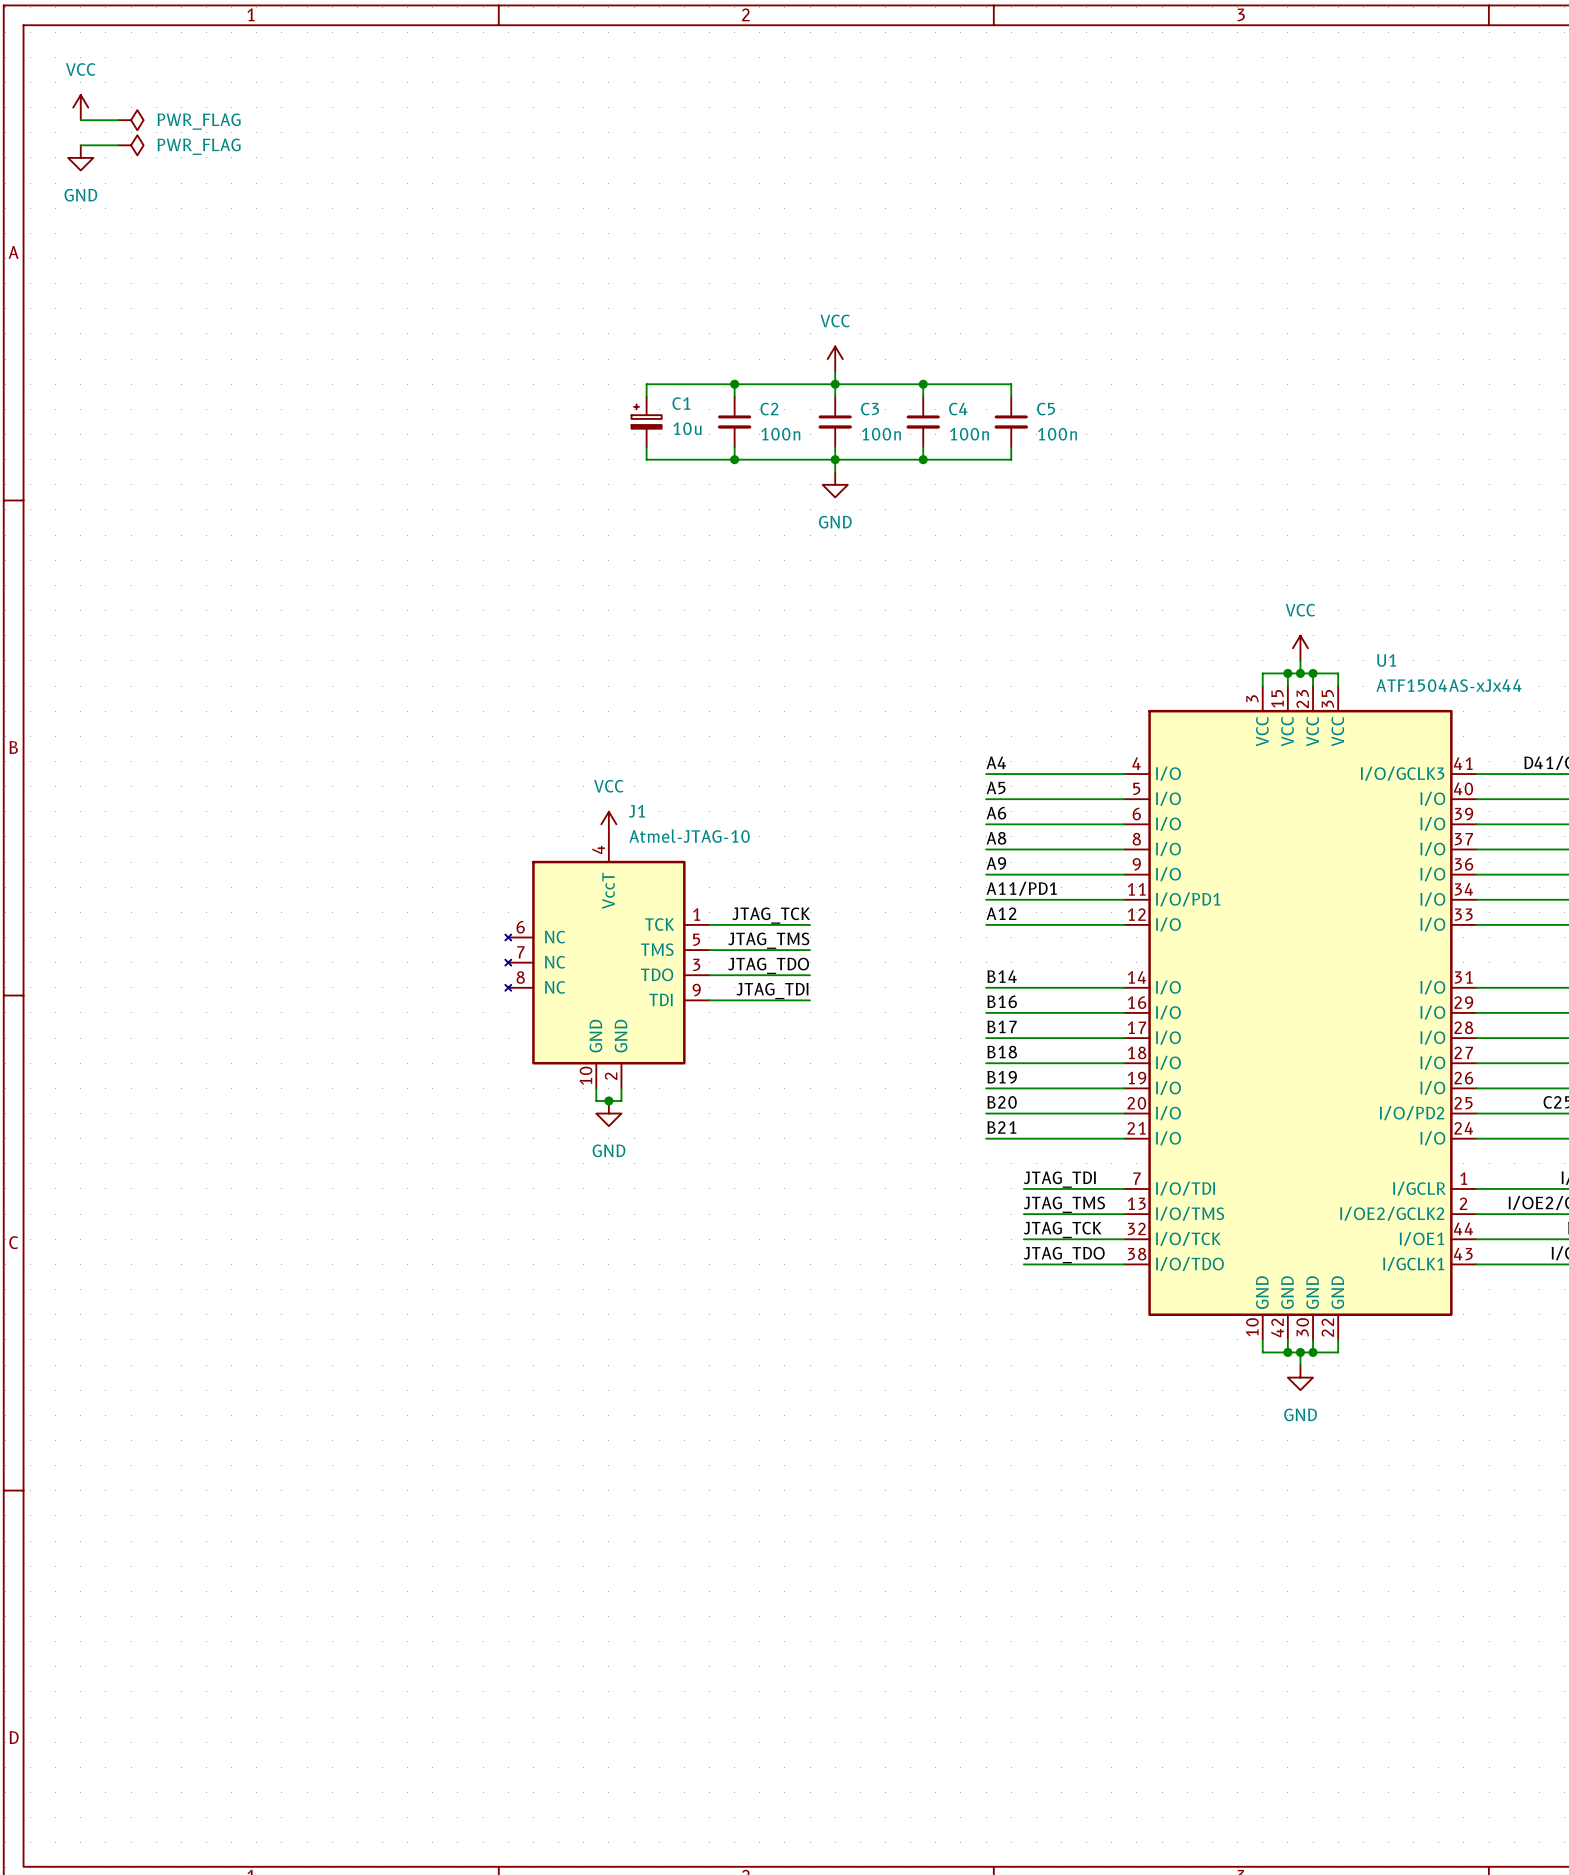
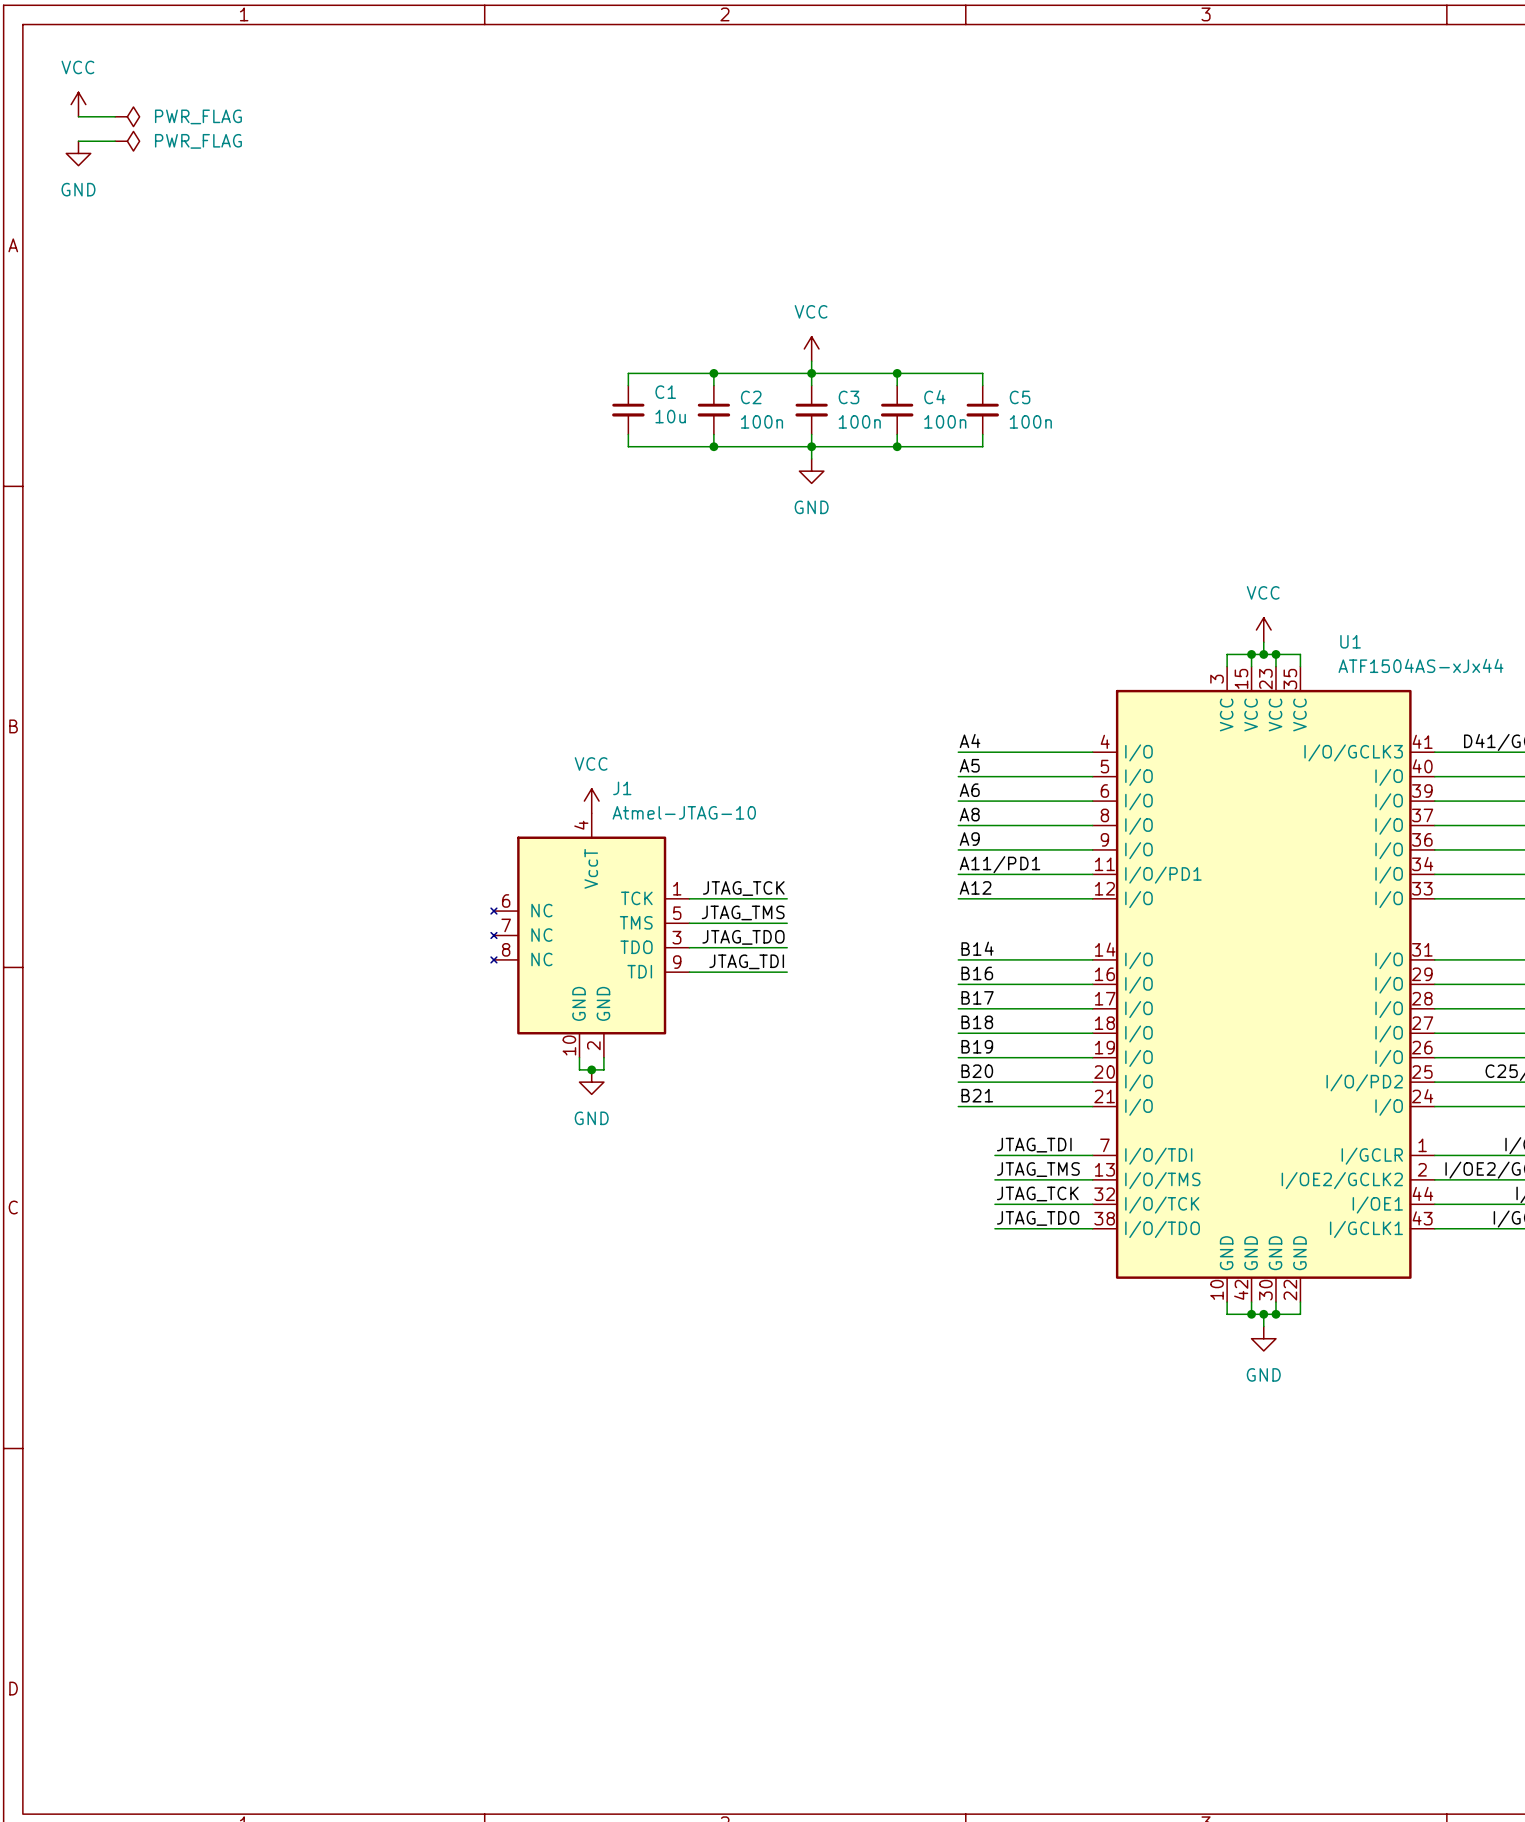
C1 symbol: [631, 396, 662, 448] -> [612, 385, 645, 435]

